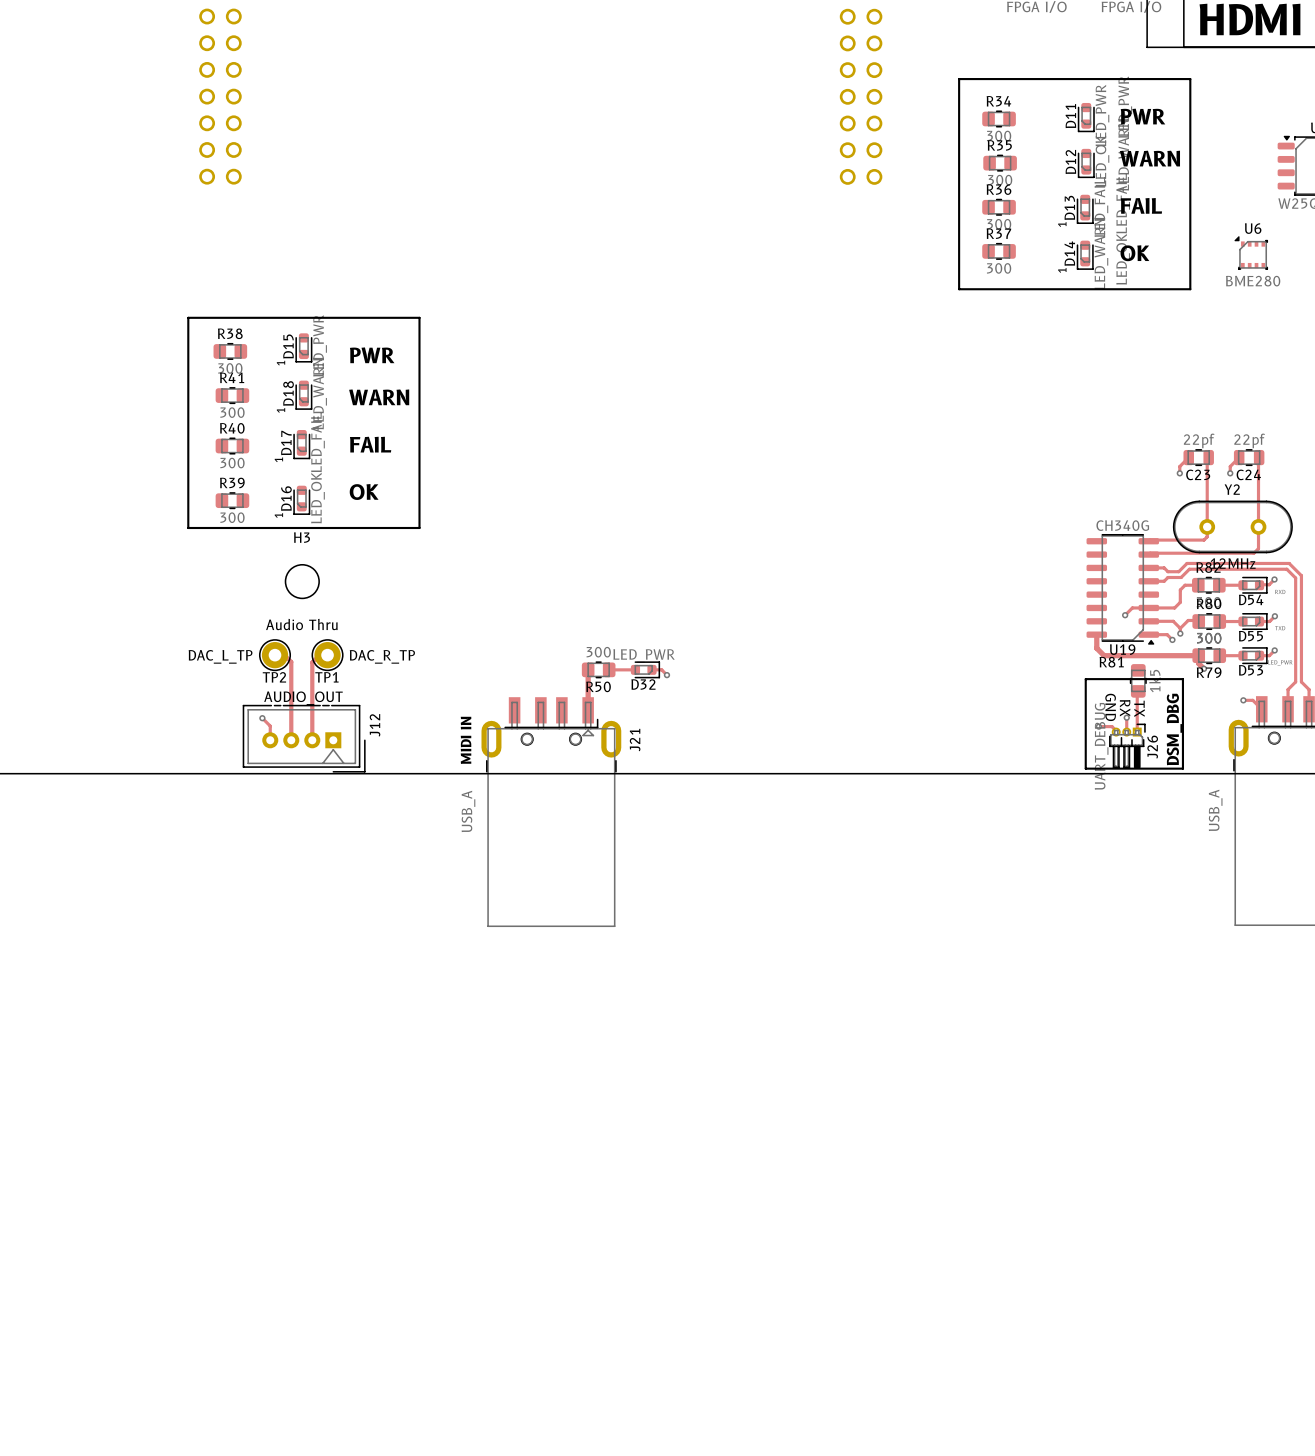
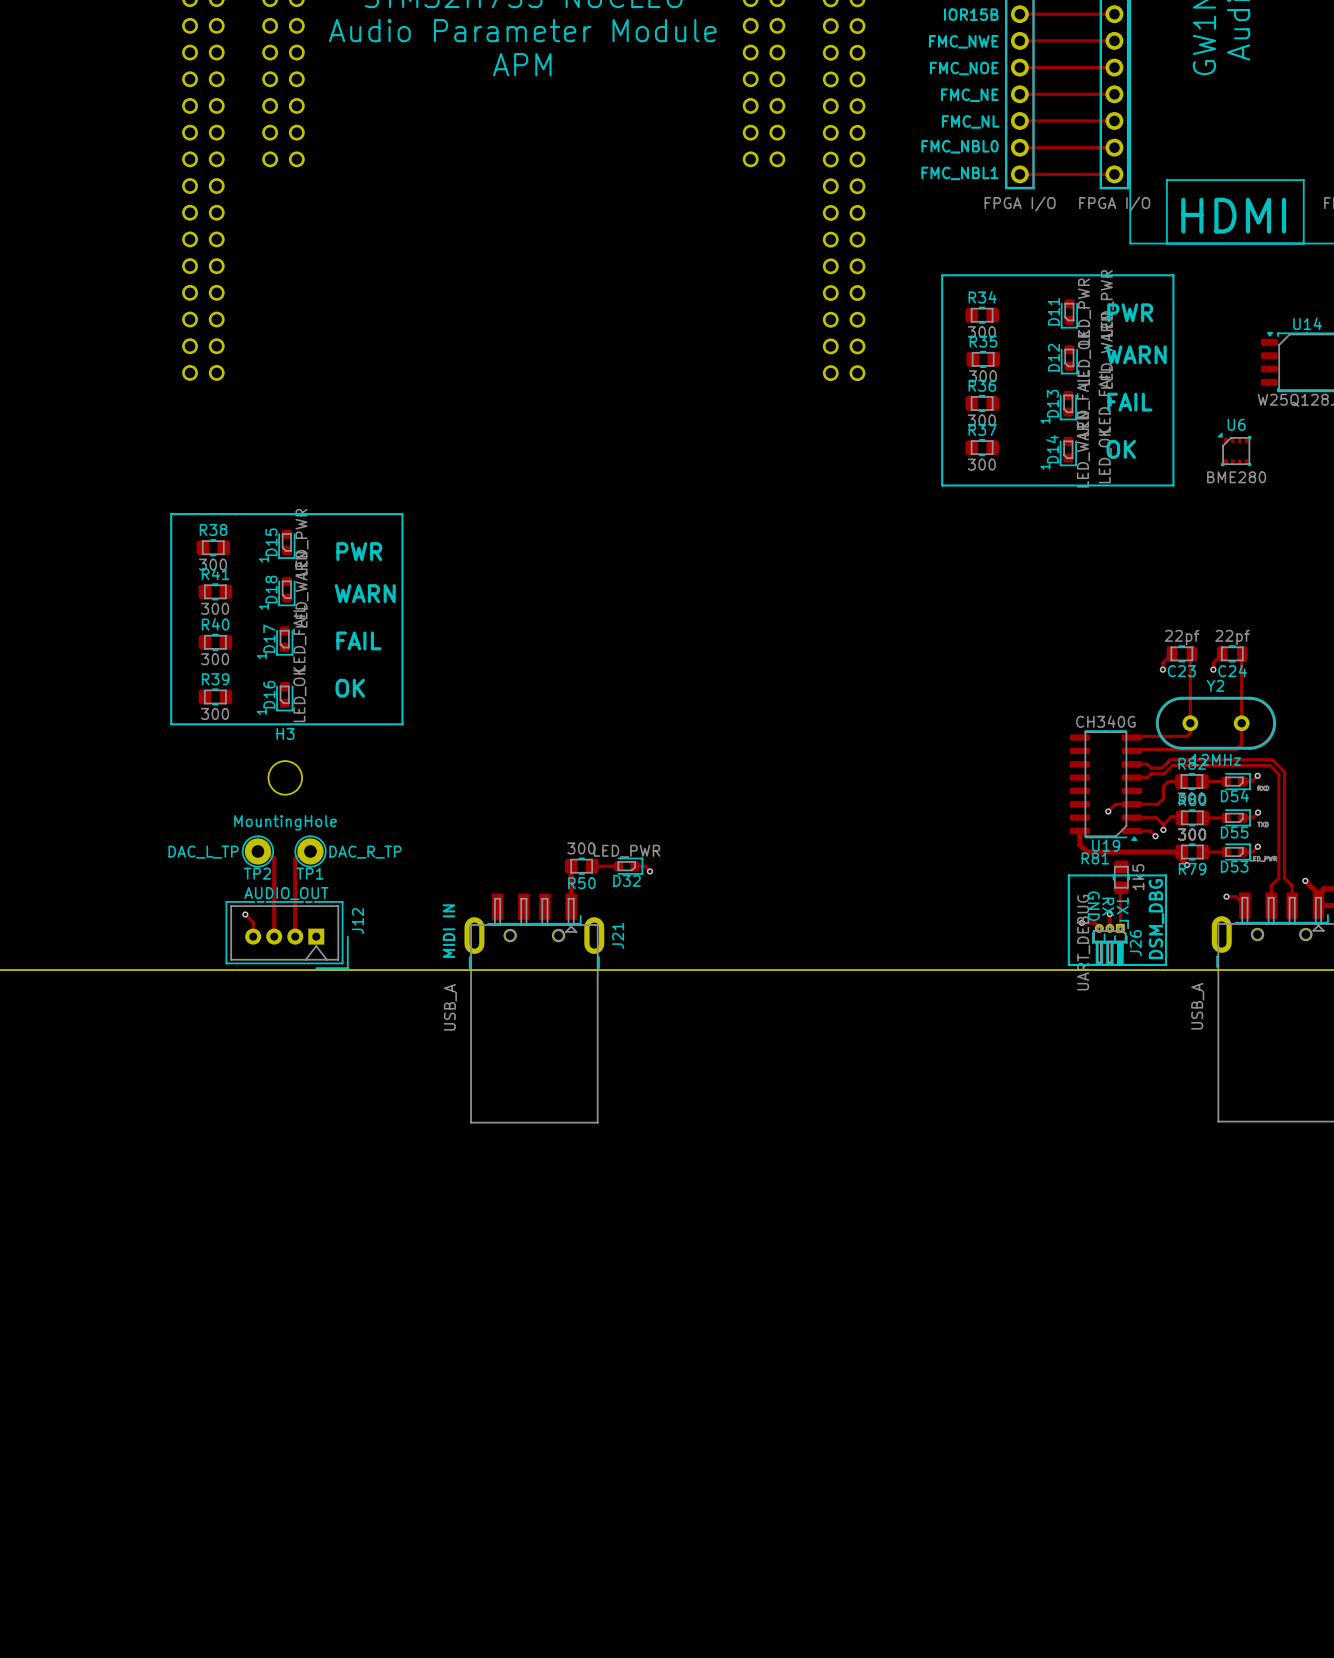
H3 value: Audio Thru (301, 624) -> MountingHole (285, 822)

